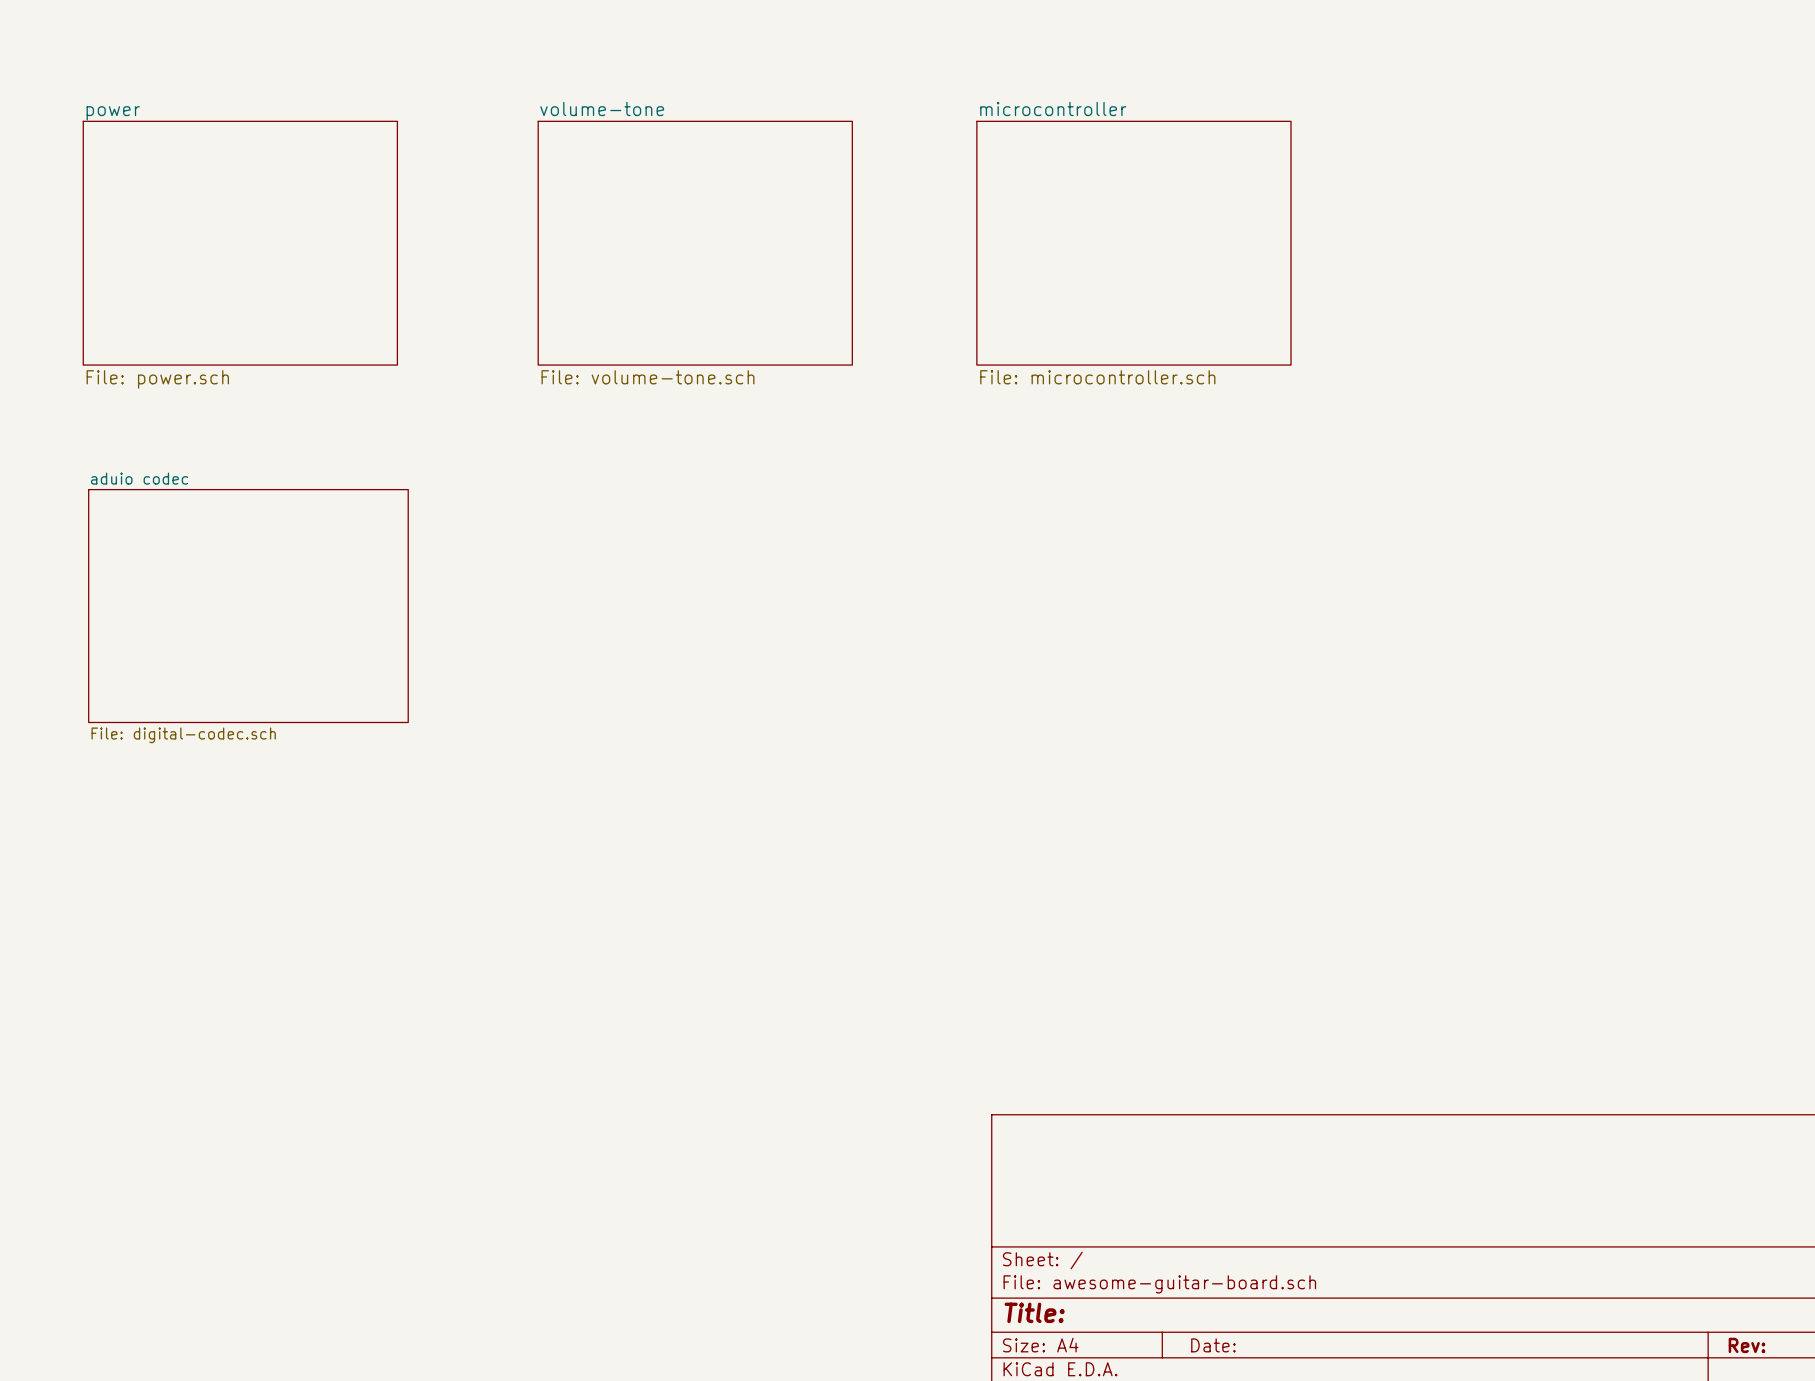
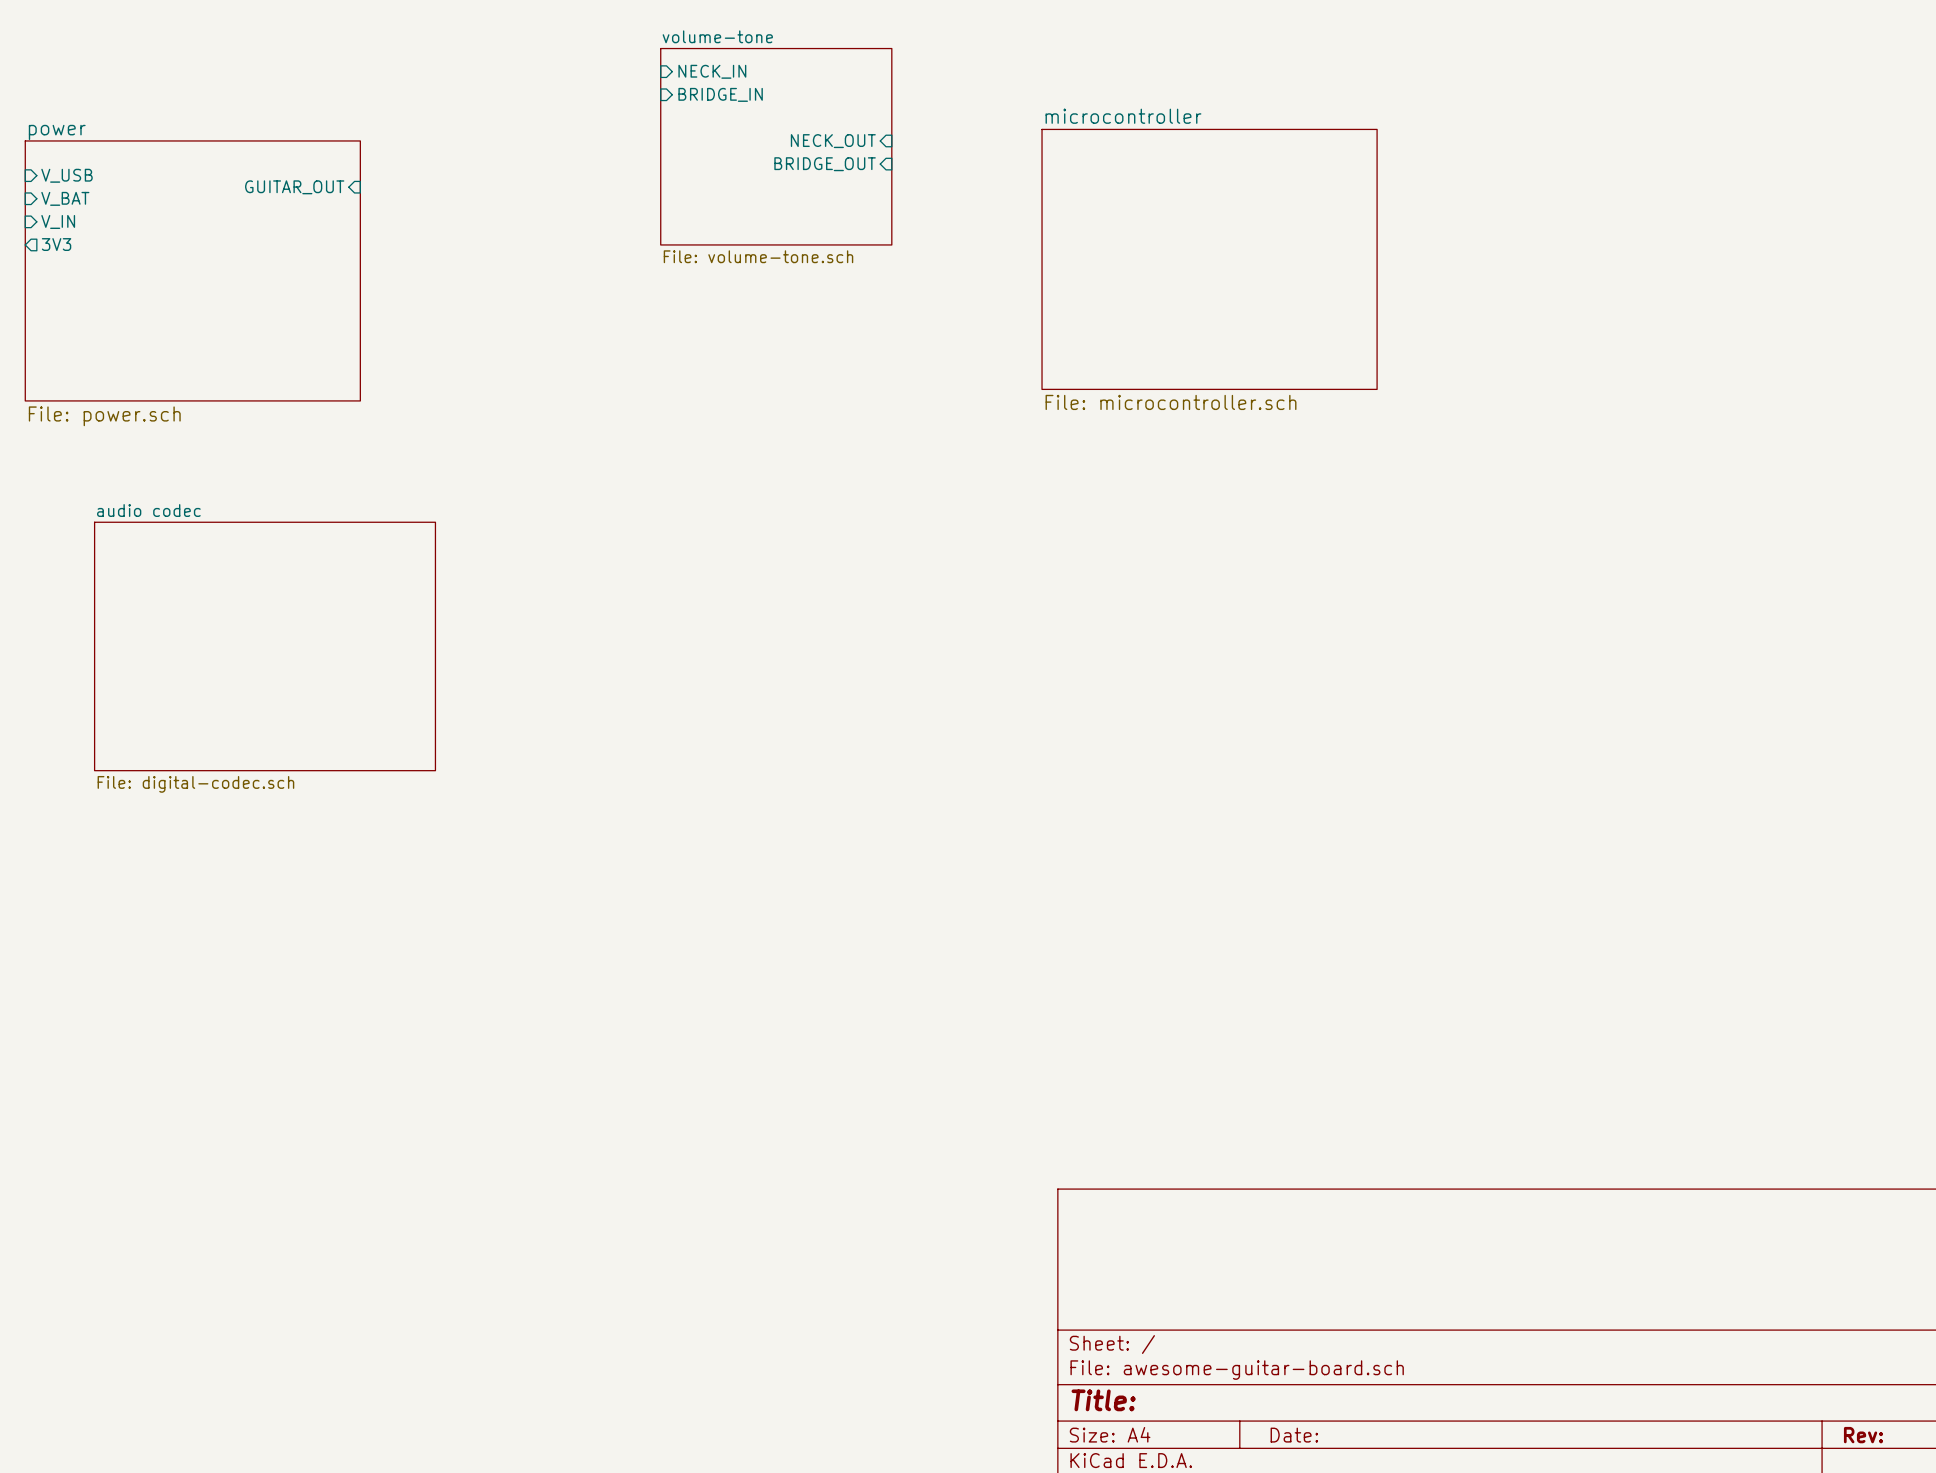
sheet pin: none -> NECK_IN (712, 71)
sheet pin: none -> BRIDGE_IN (720, 94)
sheet pin: none -> NECK_OUT (833, 141)
sheet volume-tone: none -> File: volume-tone.sch (776, 146)
sheet pin: none -> BRIDGE_OUT (825, 164)
sheet pin: none -> V_USB (67, 175)
sheet pin: none -> GUITAR_OUT (294, 187)
sheet pin: none -> V_BAT (65, 198)
sheet pin: none -> V_IN (58, 221)
sheet pin: none -> 3V3 (56, 244)
sheet power position: (240, 243) -> (192, 270)
sheet volume-tone: File: volume-tone.sch (695, 243) -> none
sheet aduio codec name: aduio codec (139, 478) -> audio codec (148, 510)

